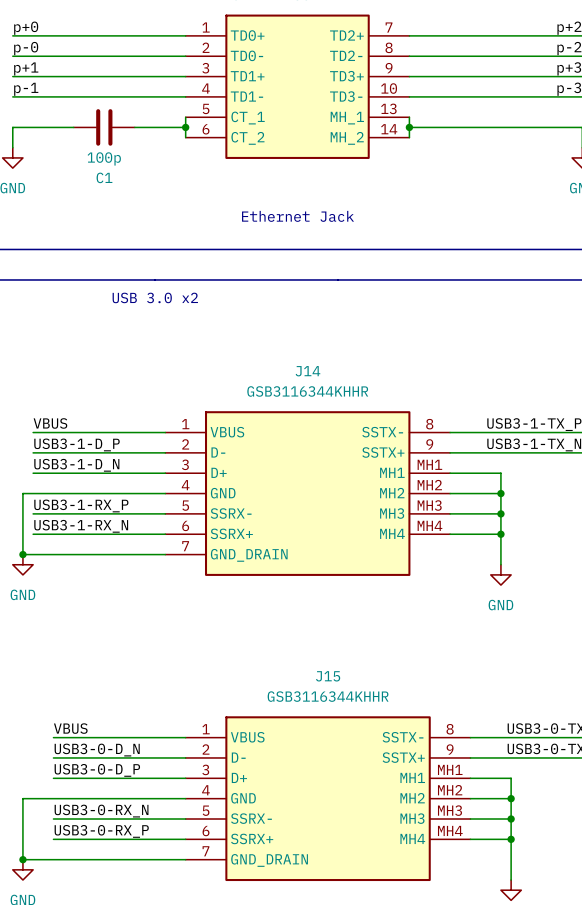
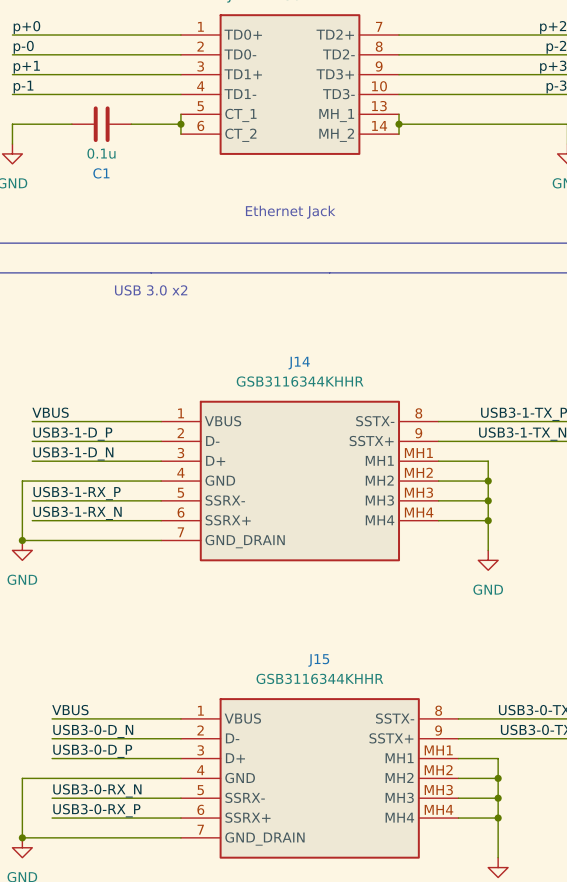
C1 value: 100p (104, 158) -> 0.1u (101, 153)

